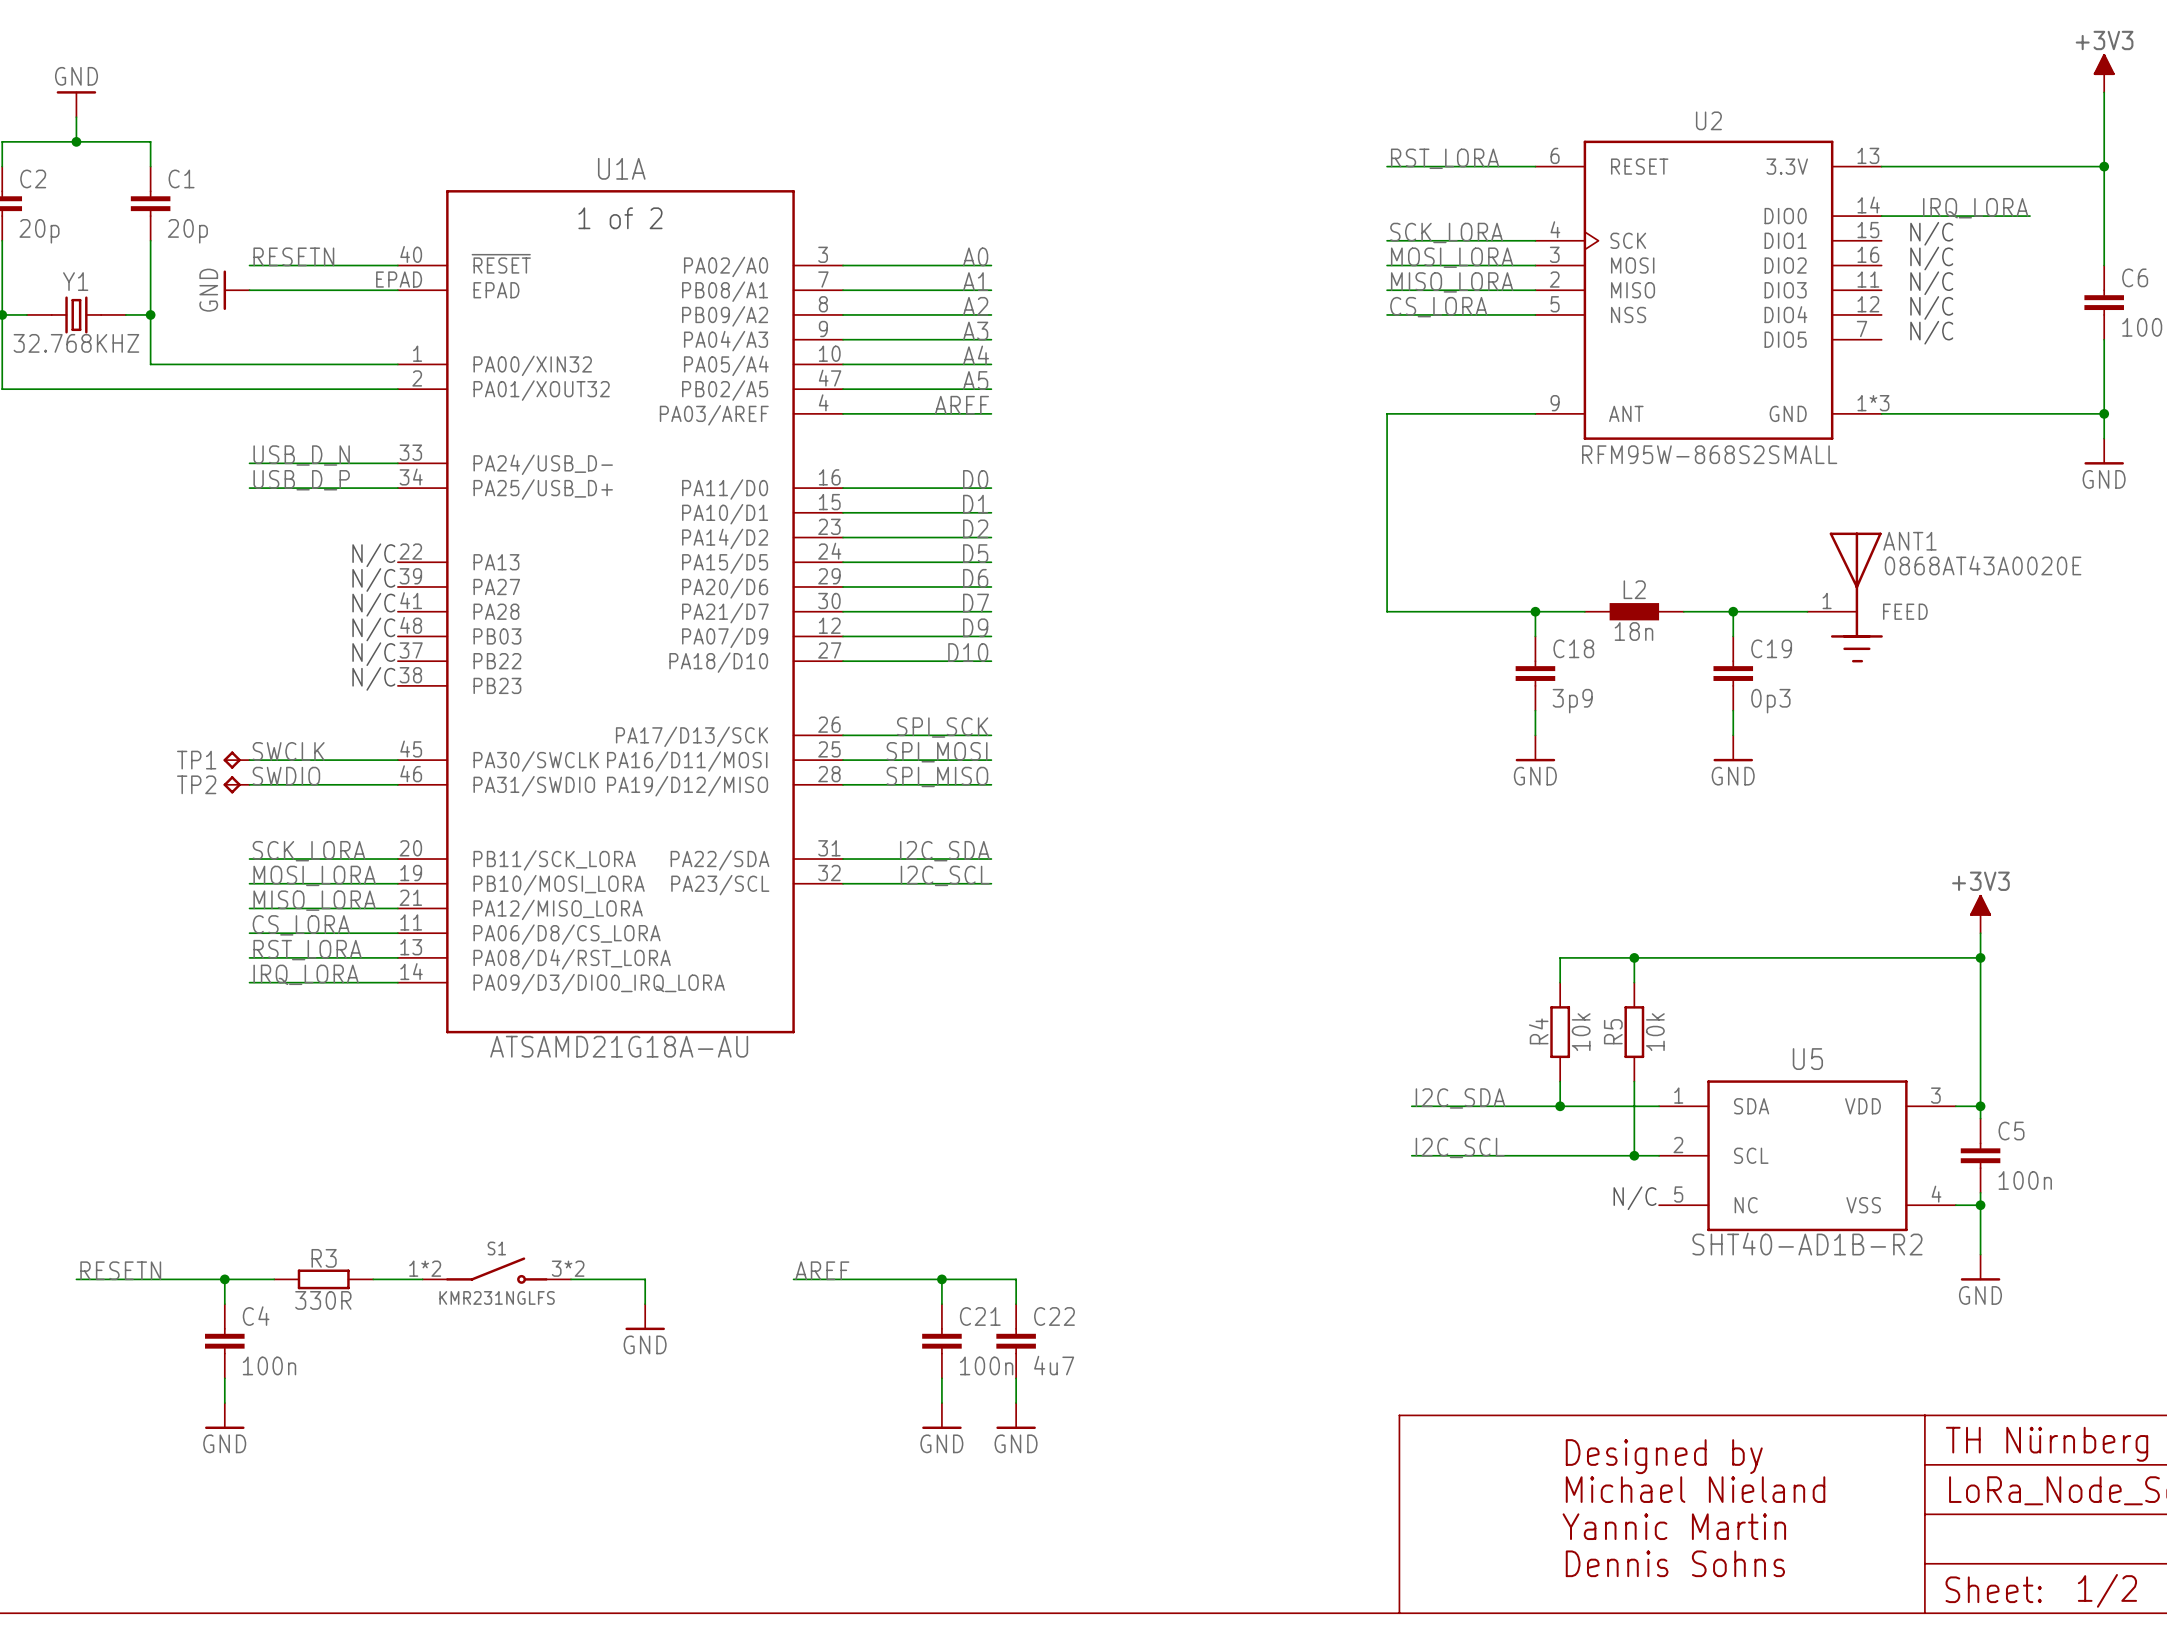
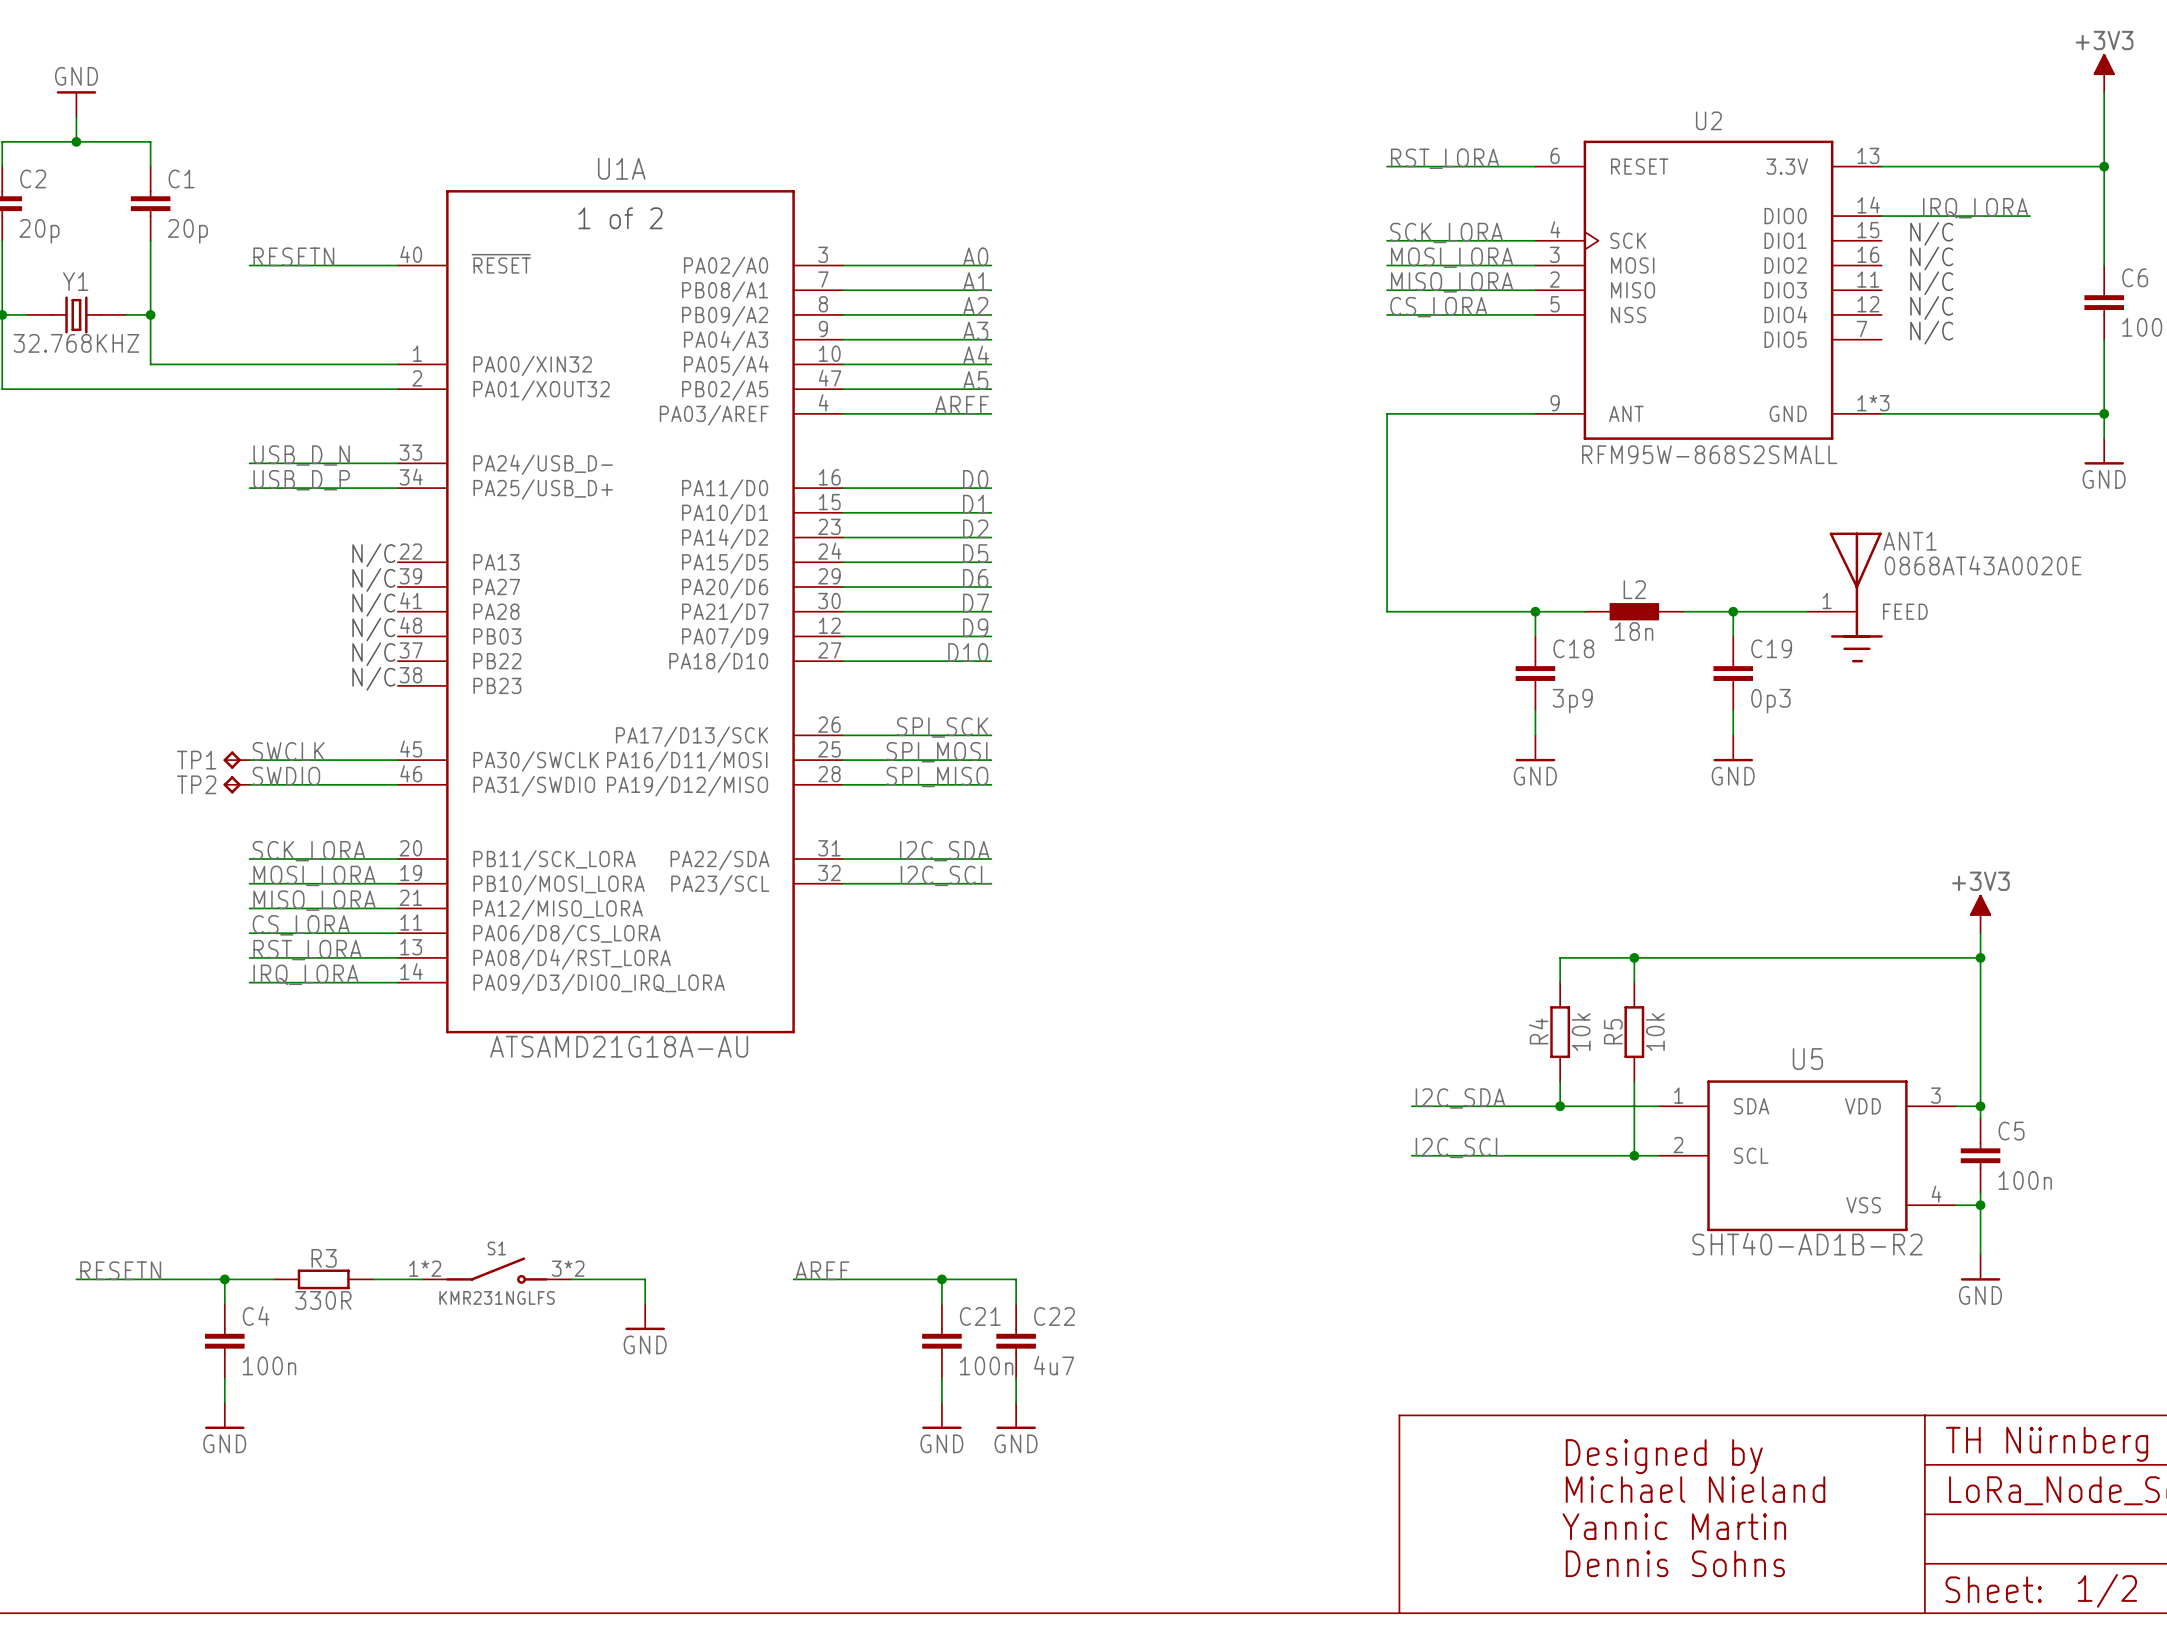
U1A symbol: [397, 190, 844, 1034] -> [397, 190, 844, 1034]
power symbol: GND (236, 290) -> none
wire: (249, 290) (397, 290) -> none
U5 symbol: [1659, 1080, 1956, 1232] -> [1659, 1080, 1956, 1232]
text: N/C (1635, 1198) -> none

